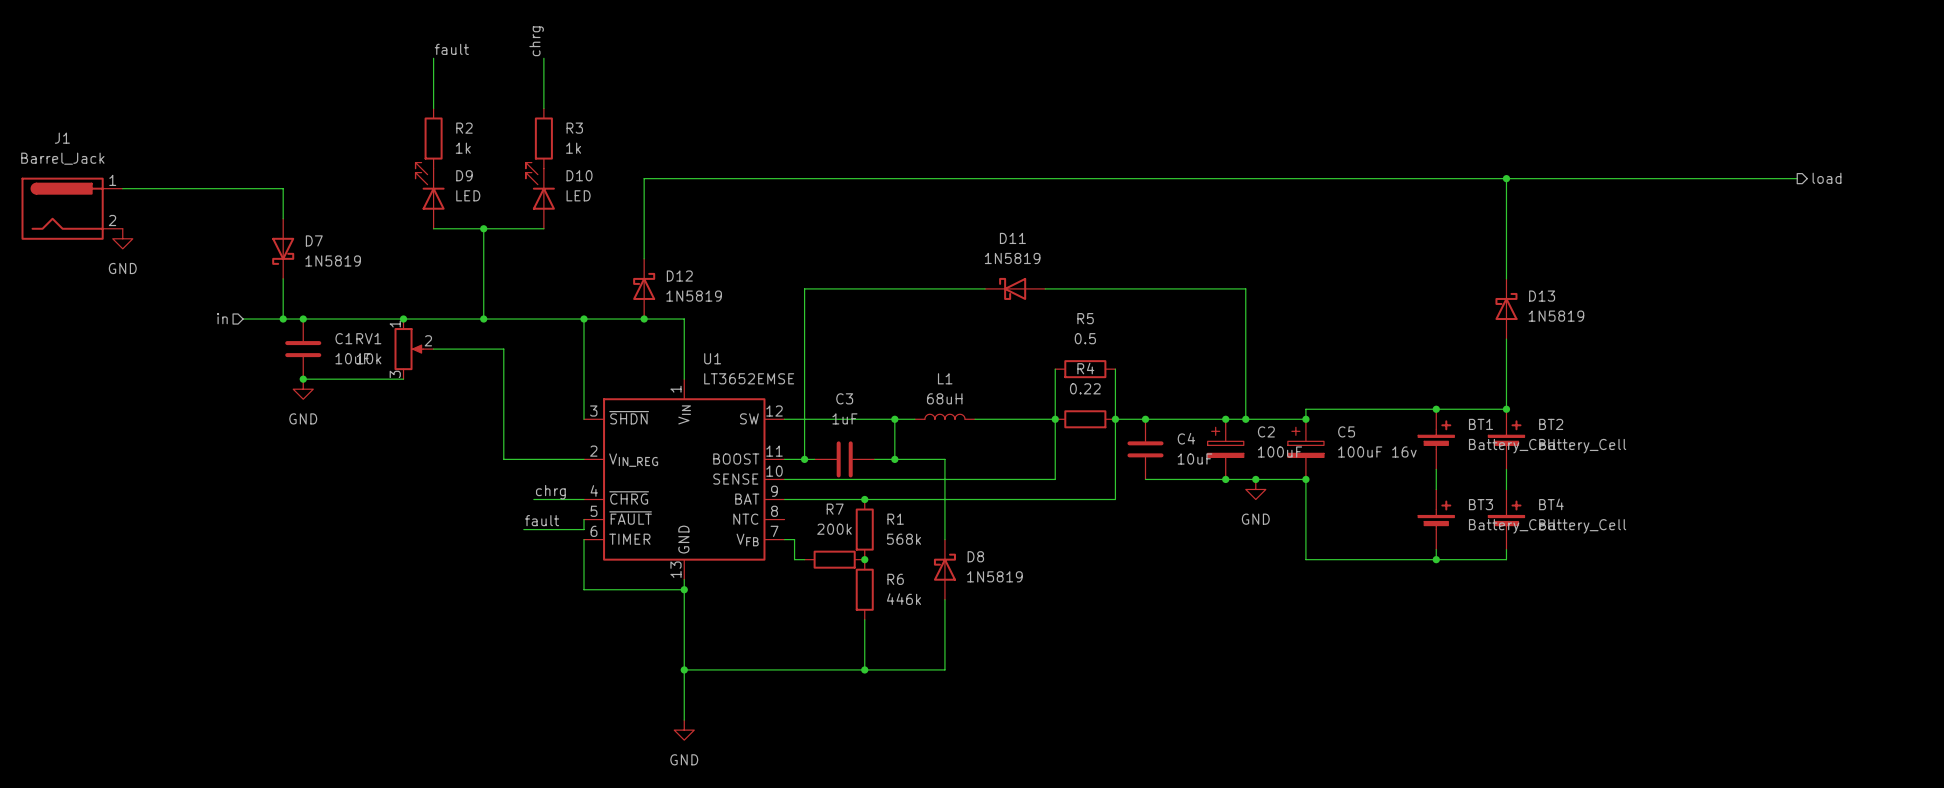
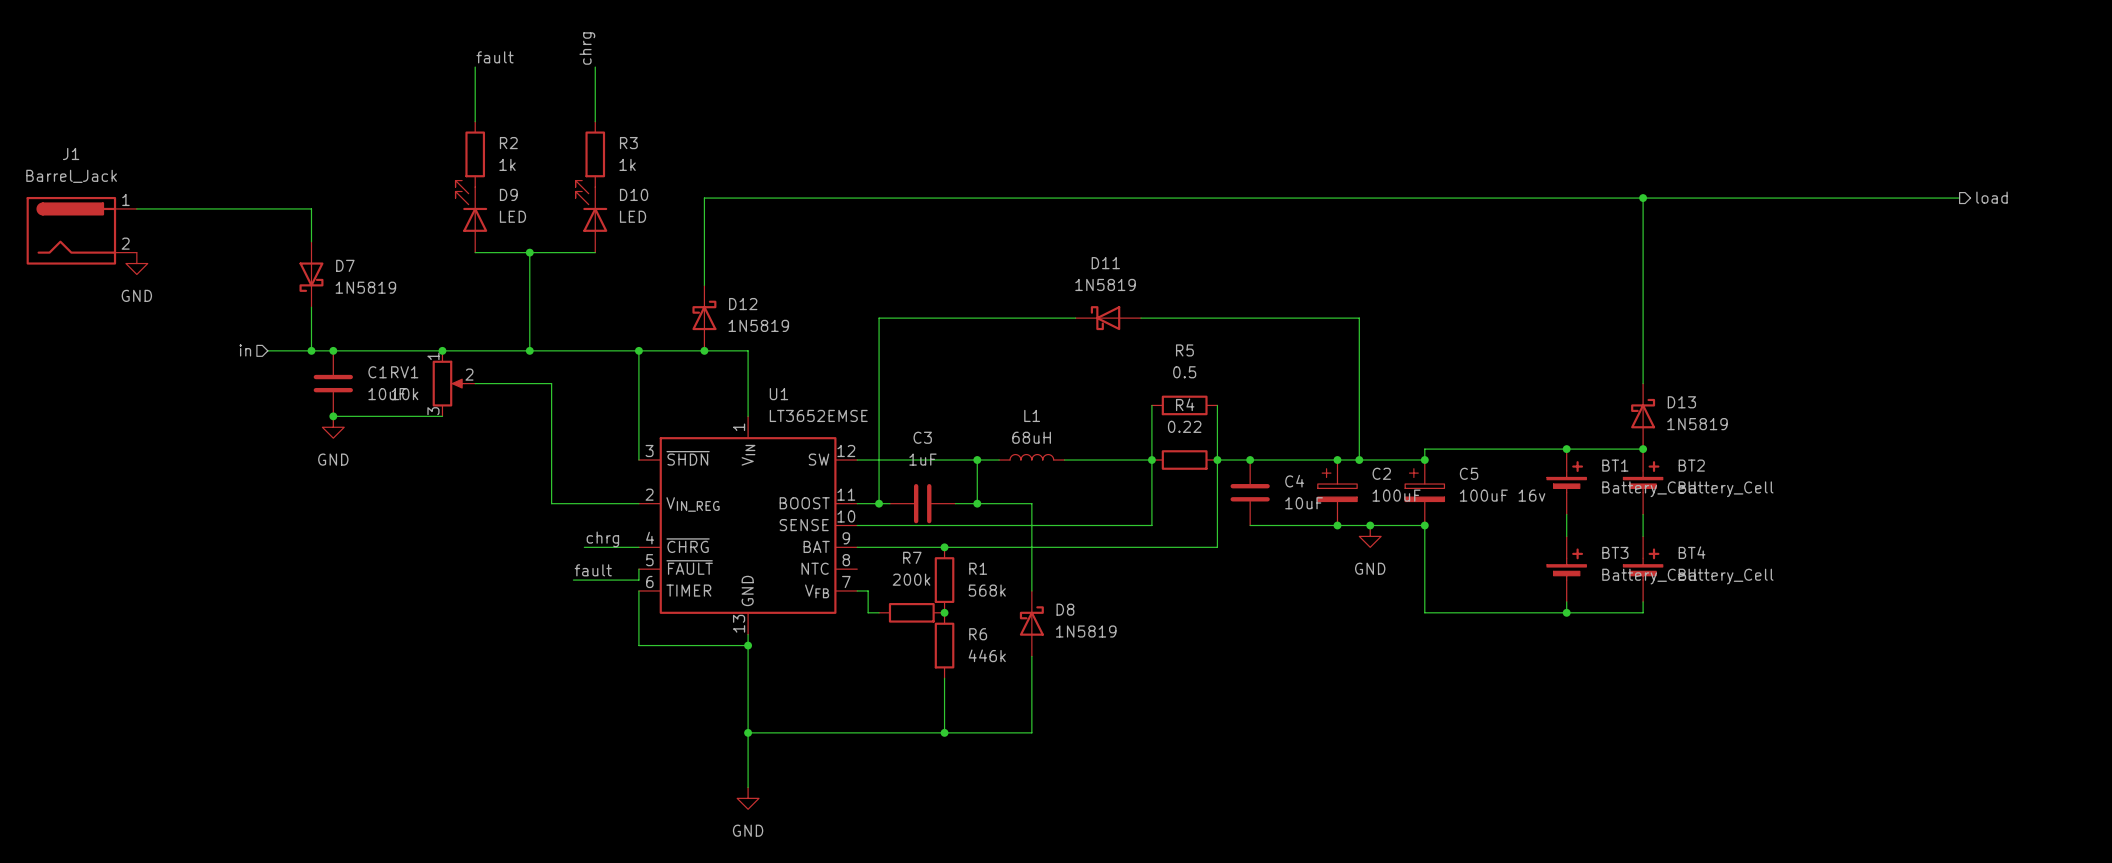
D13 position: (1506, 308) -> (1643, 416)

